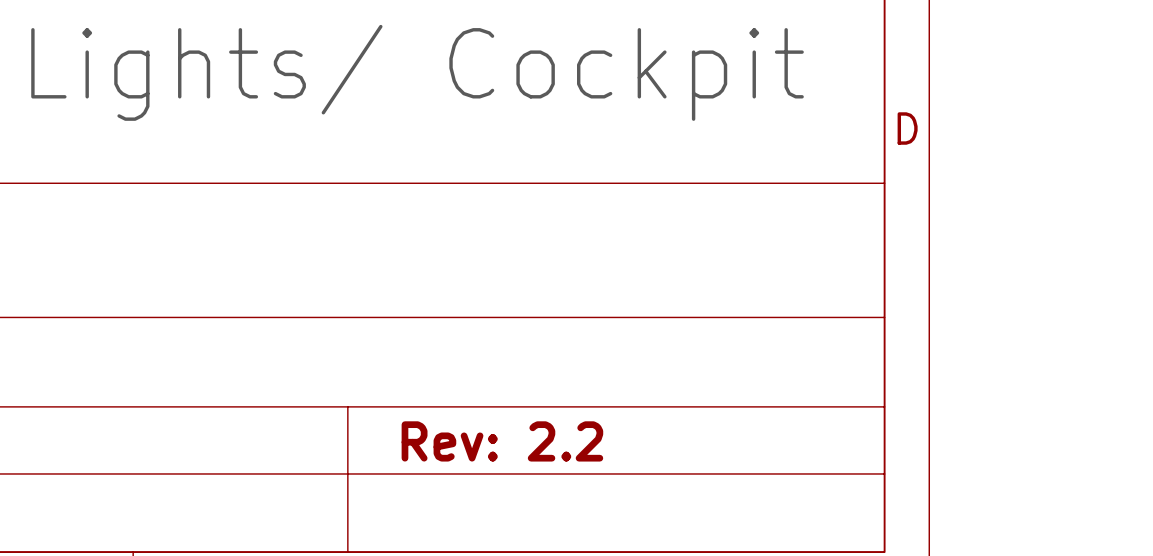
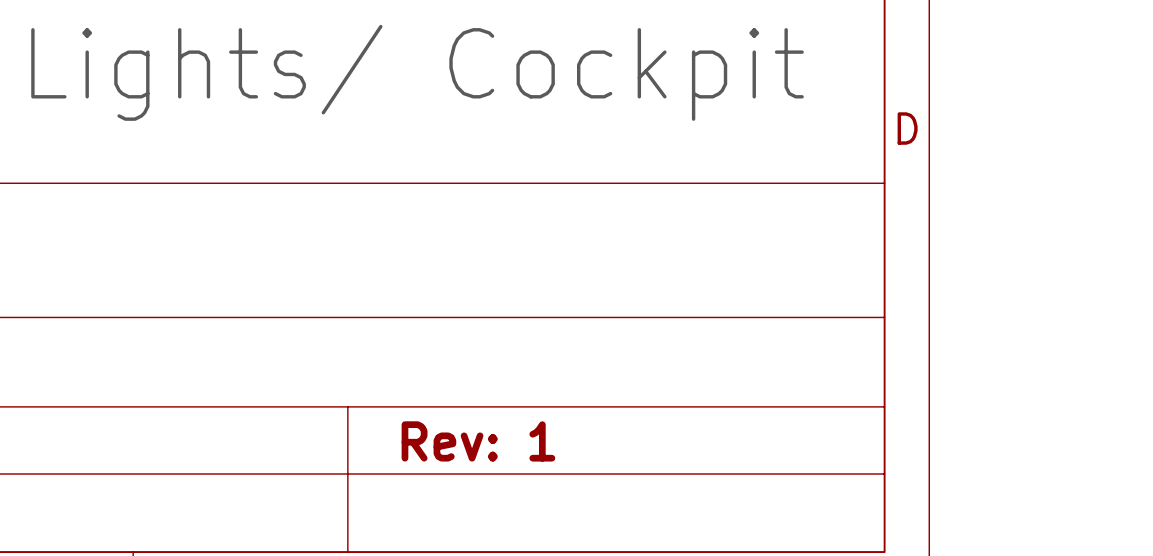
title block: Rev: 2.2 (502, 441) -> Rev: 1 (478, 441)

